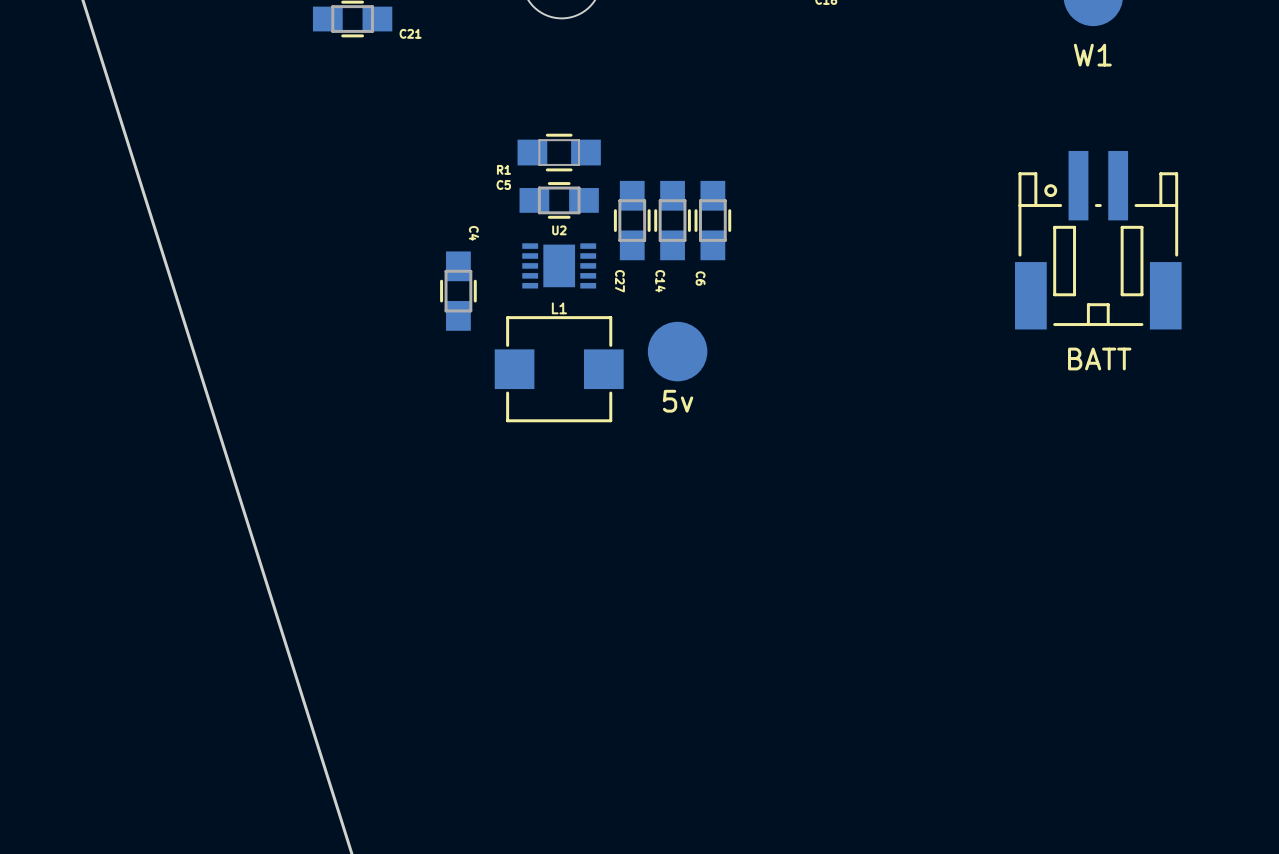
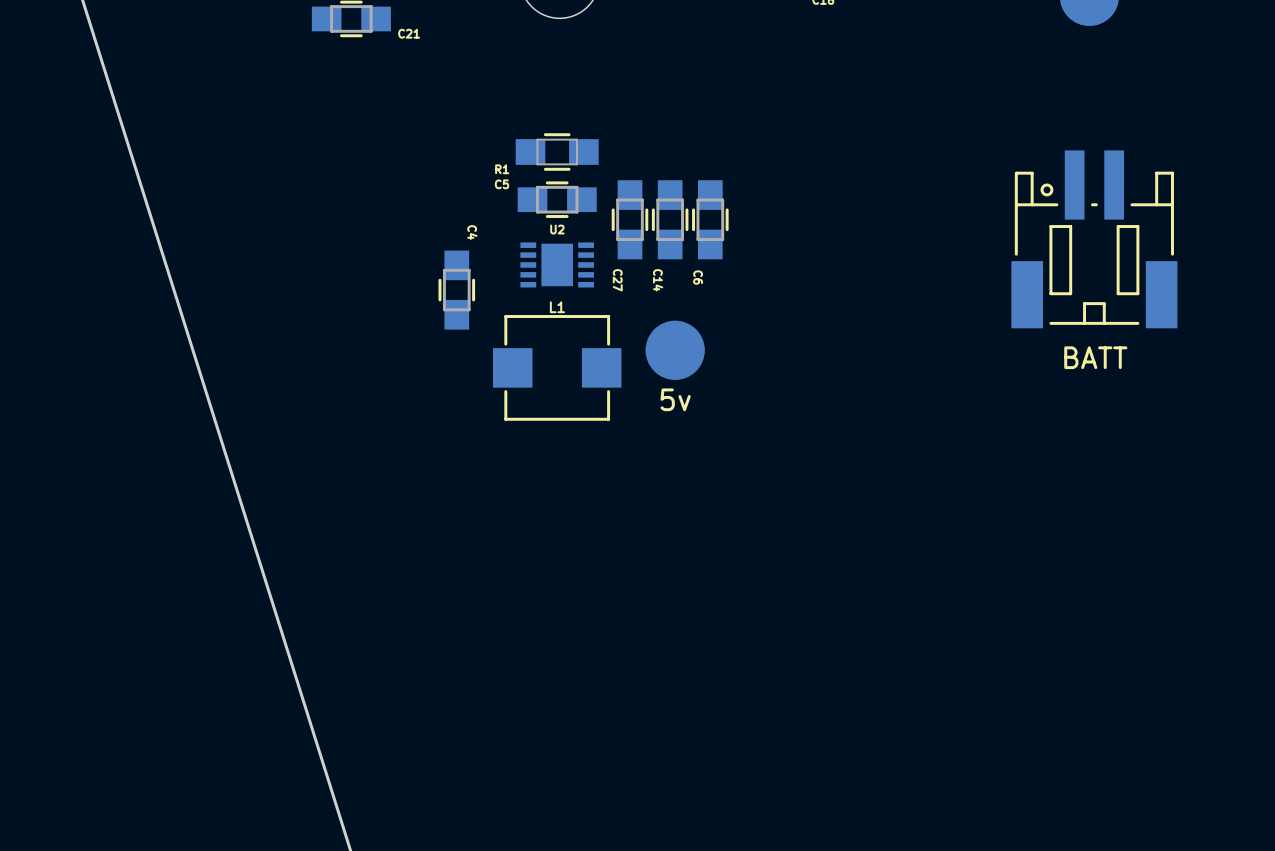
W1 name: W1 (1092, 55) -> none

